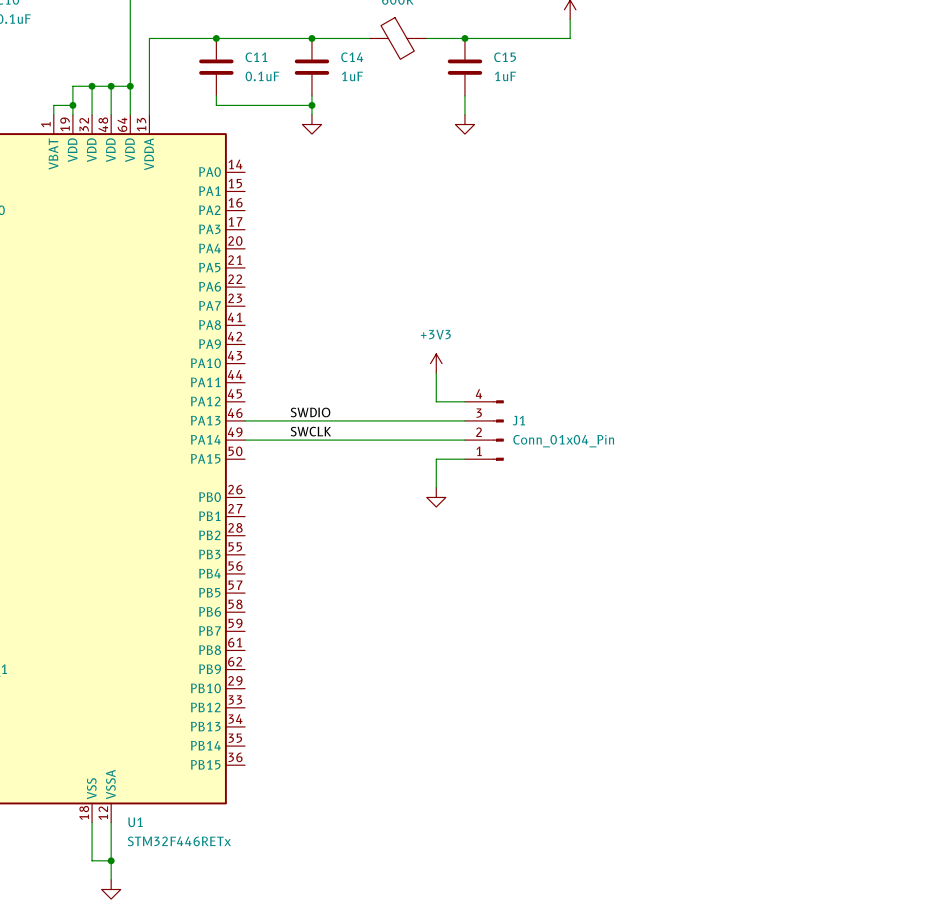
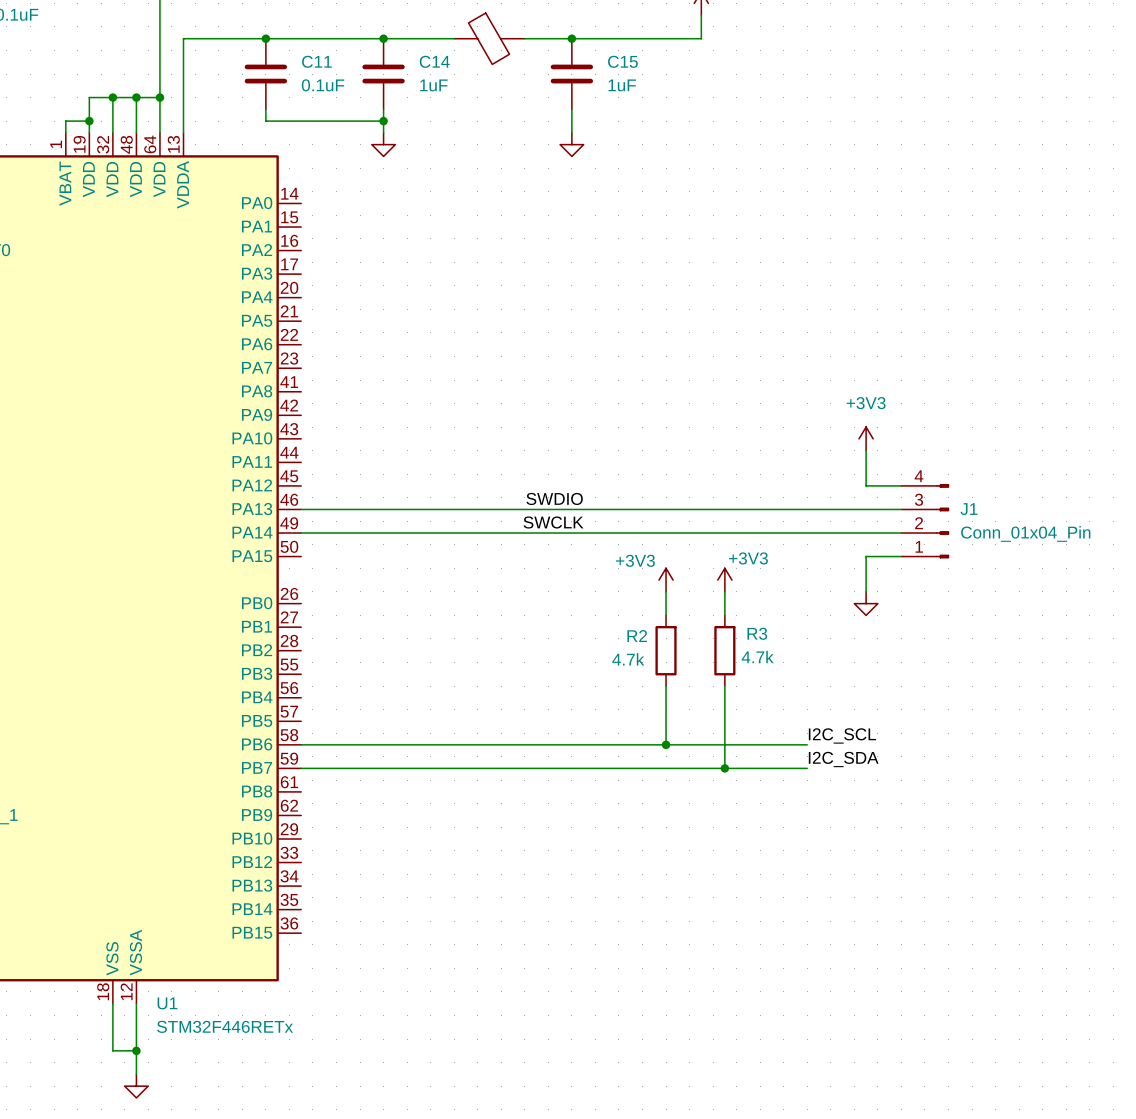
power symbol: +3V3 (436, 363) -> none
power symbol: none -> +3V3 (866, 438)
wire: (436, 373) (436, 401) (464, 401) -> none
wire: none -> (866, 450) (866, 485) (901, 485)
label position: SWDIO (310, 412) -> SWDIO (554, 498)
wire: none -> (571, 509) (901, 509)
J1 position: (484, 430) -> (925, 521)
label position: SWCLK (310, 431) -> SWCLK (553, 522)
wire: none -> (571, 533) (901, 533)
wire: (464, 459) (436, 459) (436, 487) -> none
wire: none -> (901, 556) (866, 556) (866, 591)
power symbol: none -> +3V3 (666, 580)
power symbol: none -> +3V3 (724, 580)
wire: none -> (666, 591) (666, 615)
wire: none -> (724, 591) (724, 615)
power symbol: (436, 497) -> none
power symbol: none -> (866, 603)
R2: none -> 4.7k (666, 650)
R3: none -> 4.7k (724, 650)
wire: none -> (666, 686) (666, 744)
wire: none -> (724, 686) (724, 768)
label: none -> I2C_SCL (842, 735)
wire: none -> (301, 744) (807, 744)
junction: none -> (666, 744)
label: none -> I2C_SDA (843, 759)
wire: none -> (301, 768) (807, 768)
junction: none -> (724, 768)

